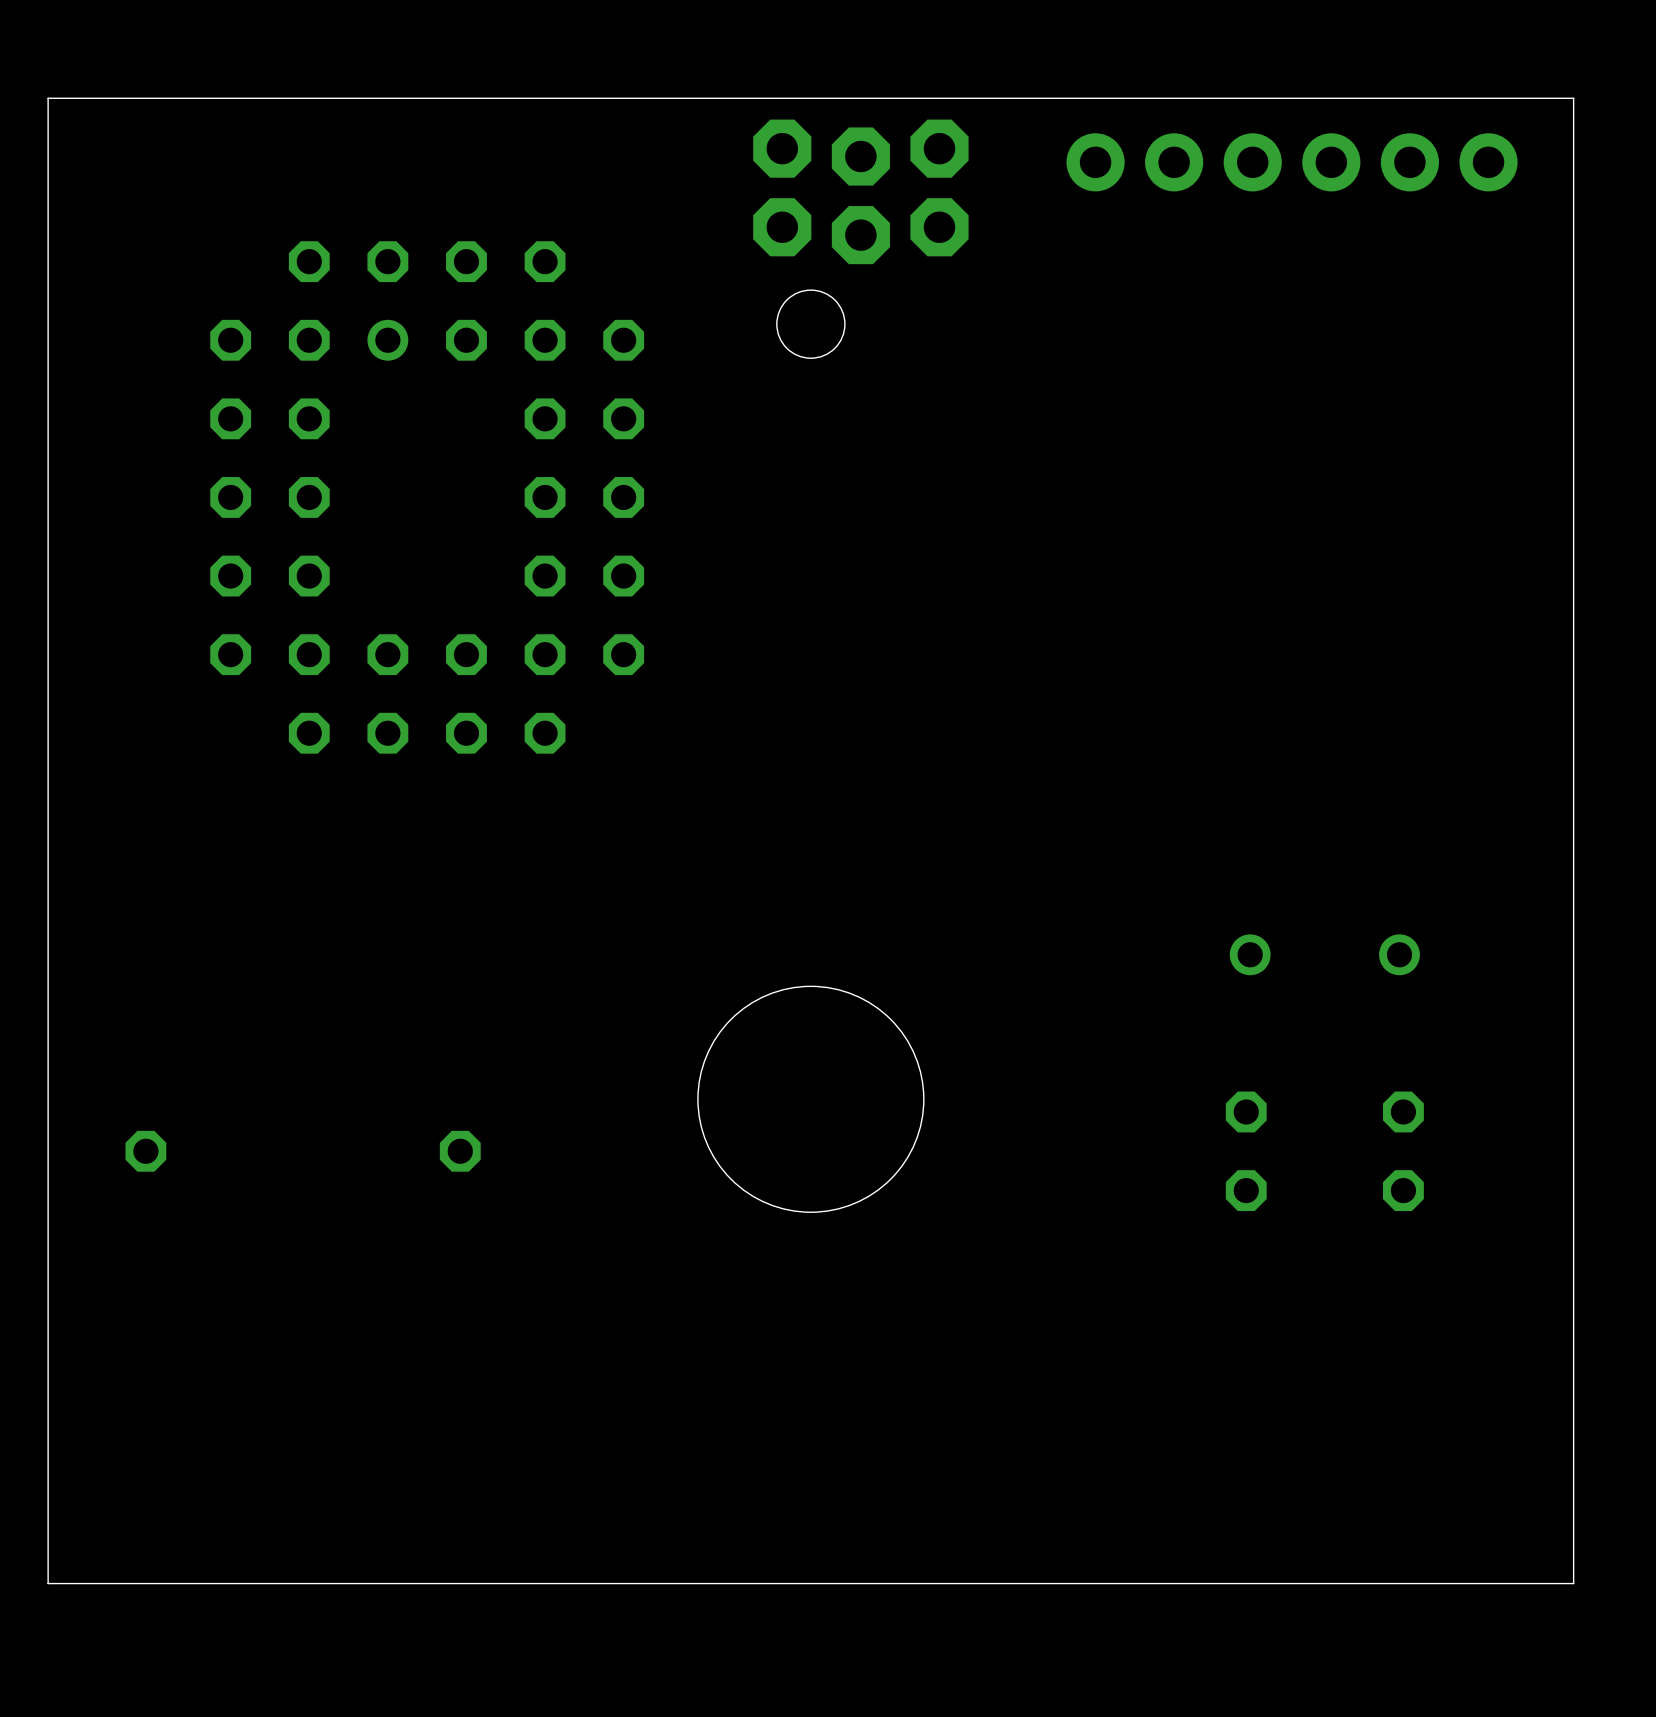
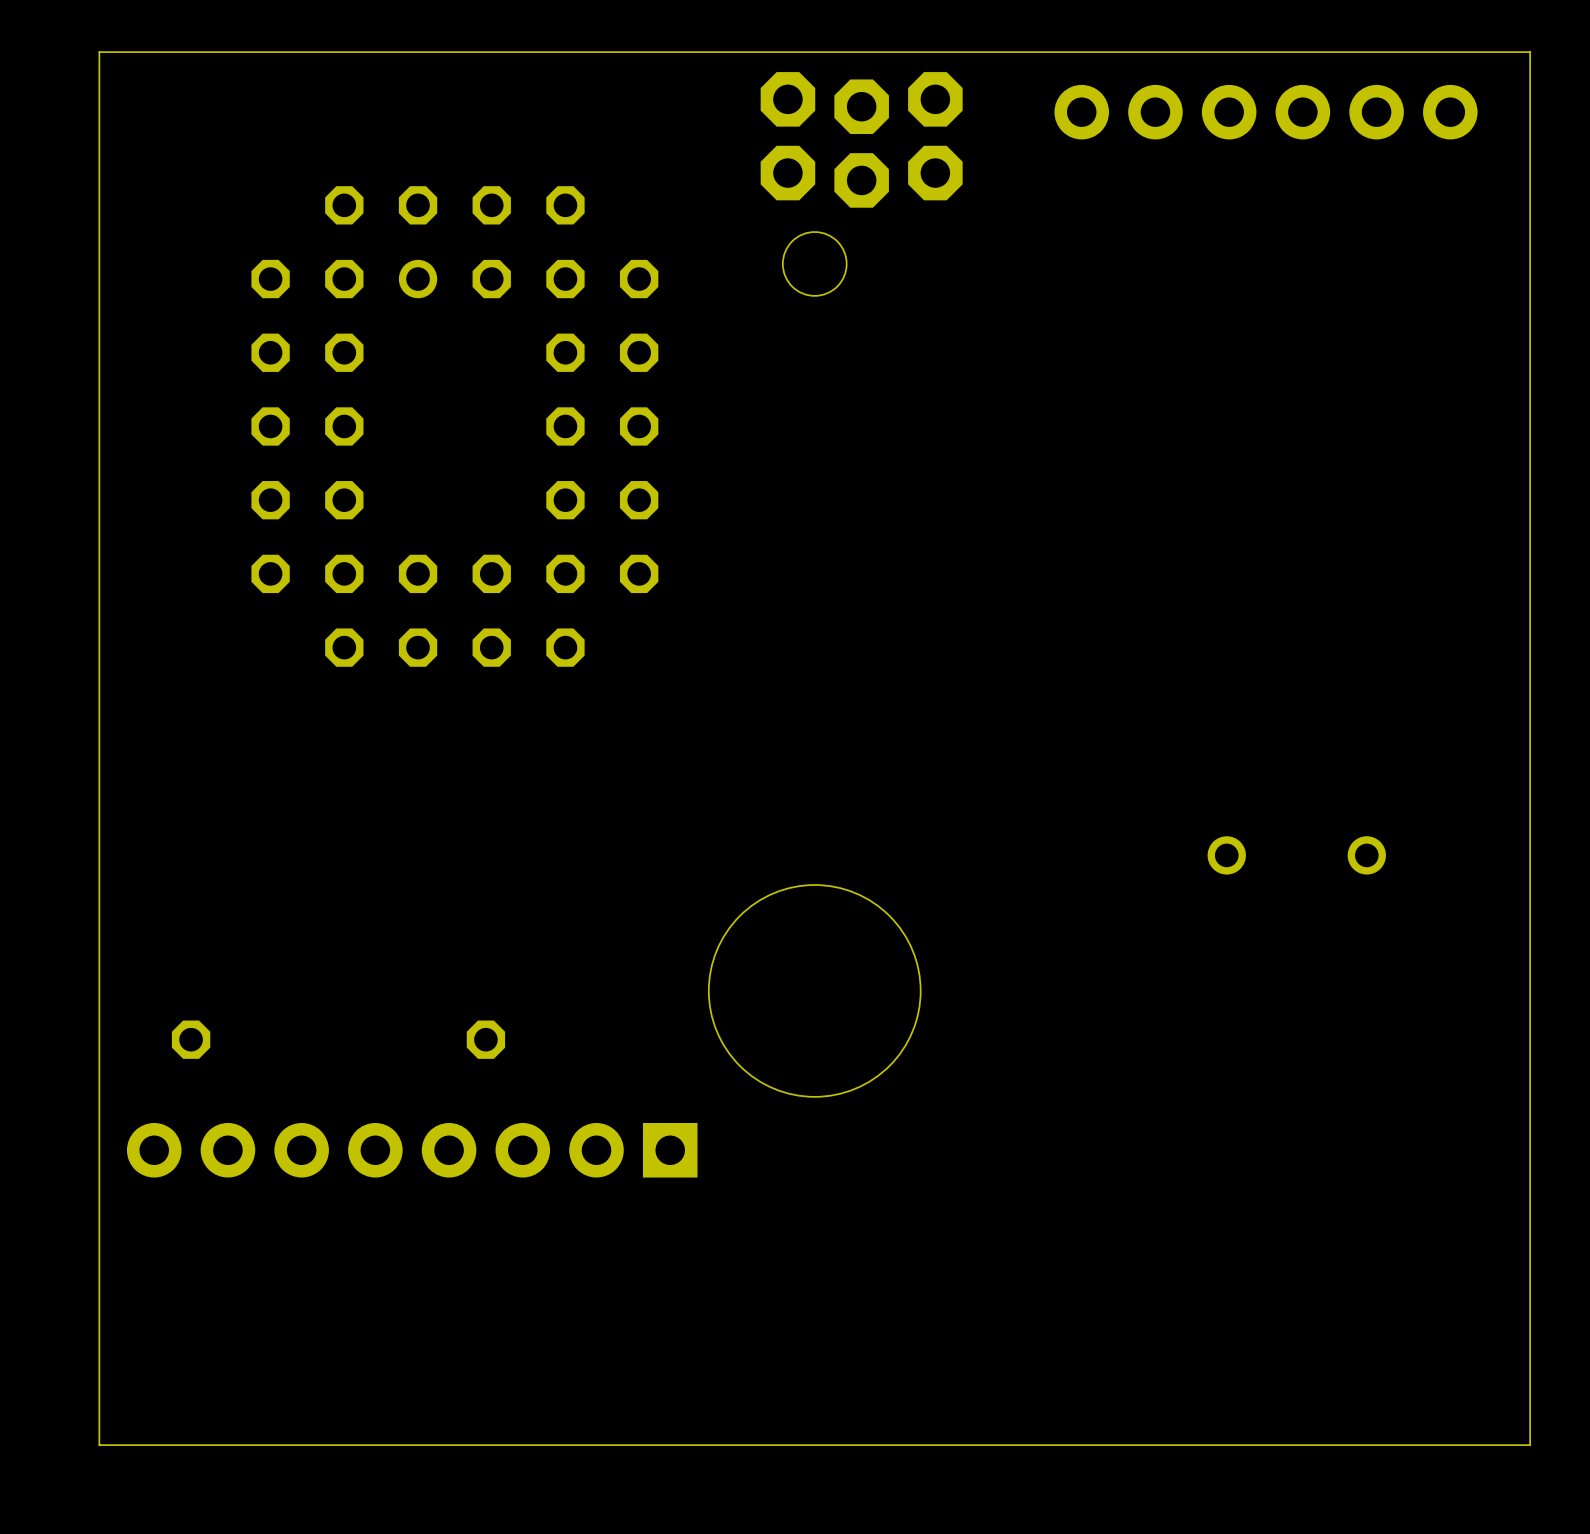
part: (1246, 1151) -> none
part: (1403, 1151) -> none
part: none -> (412, 1150)

